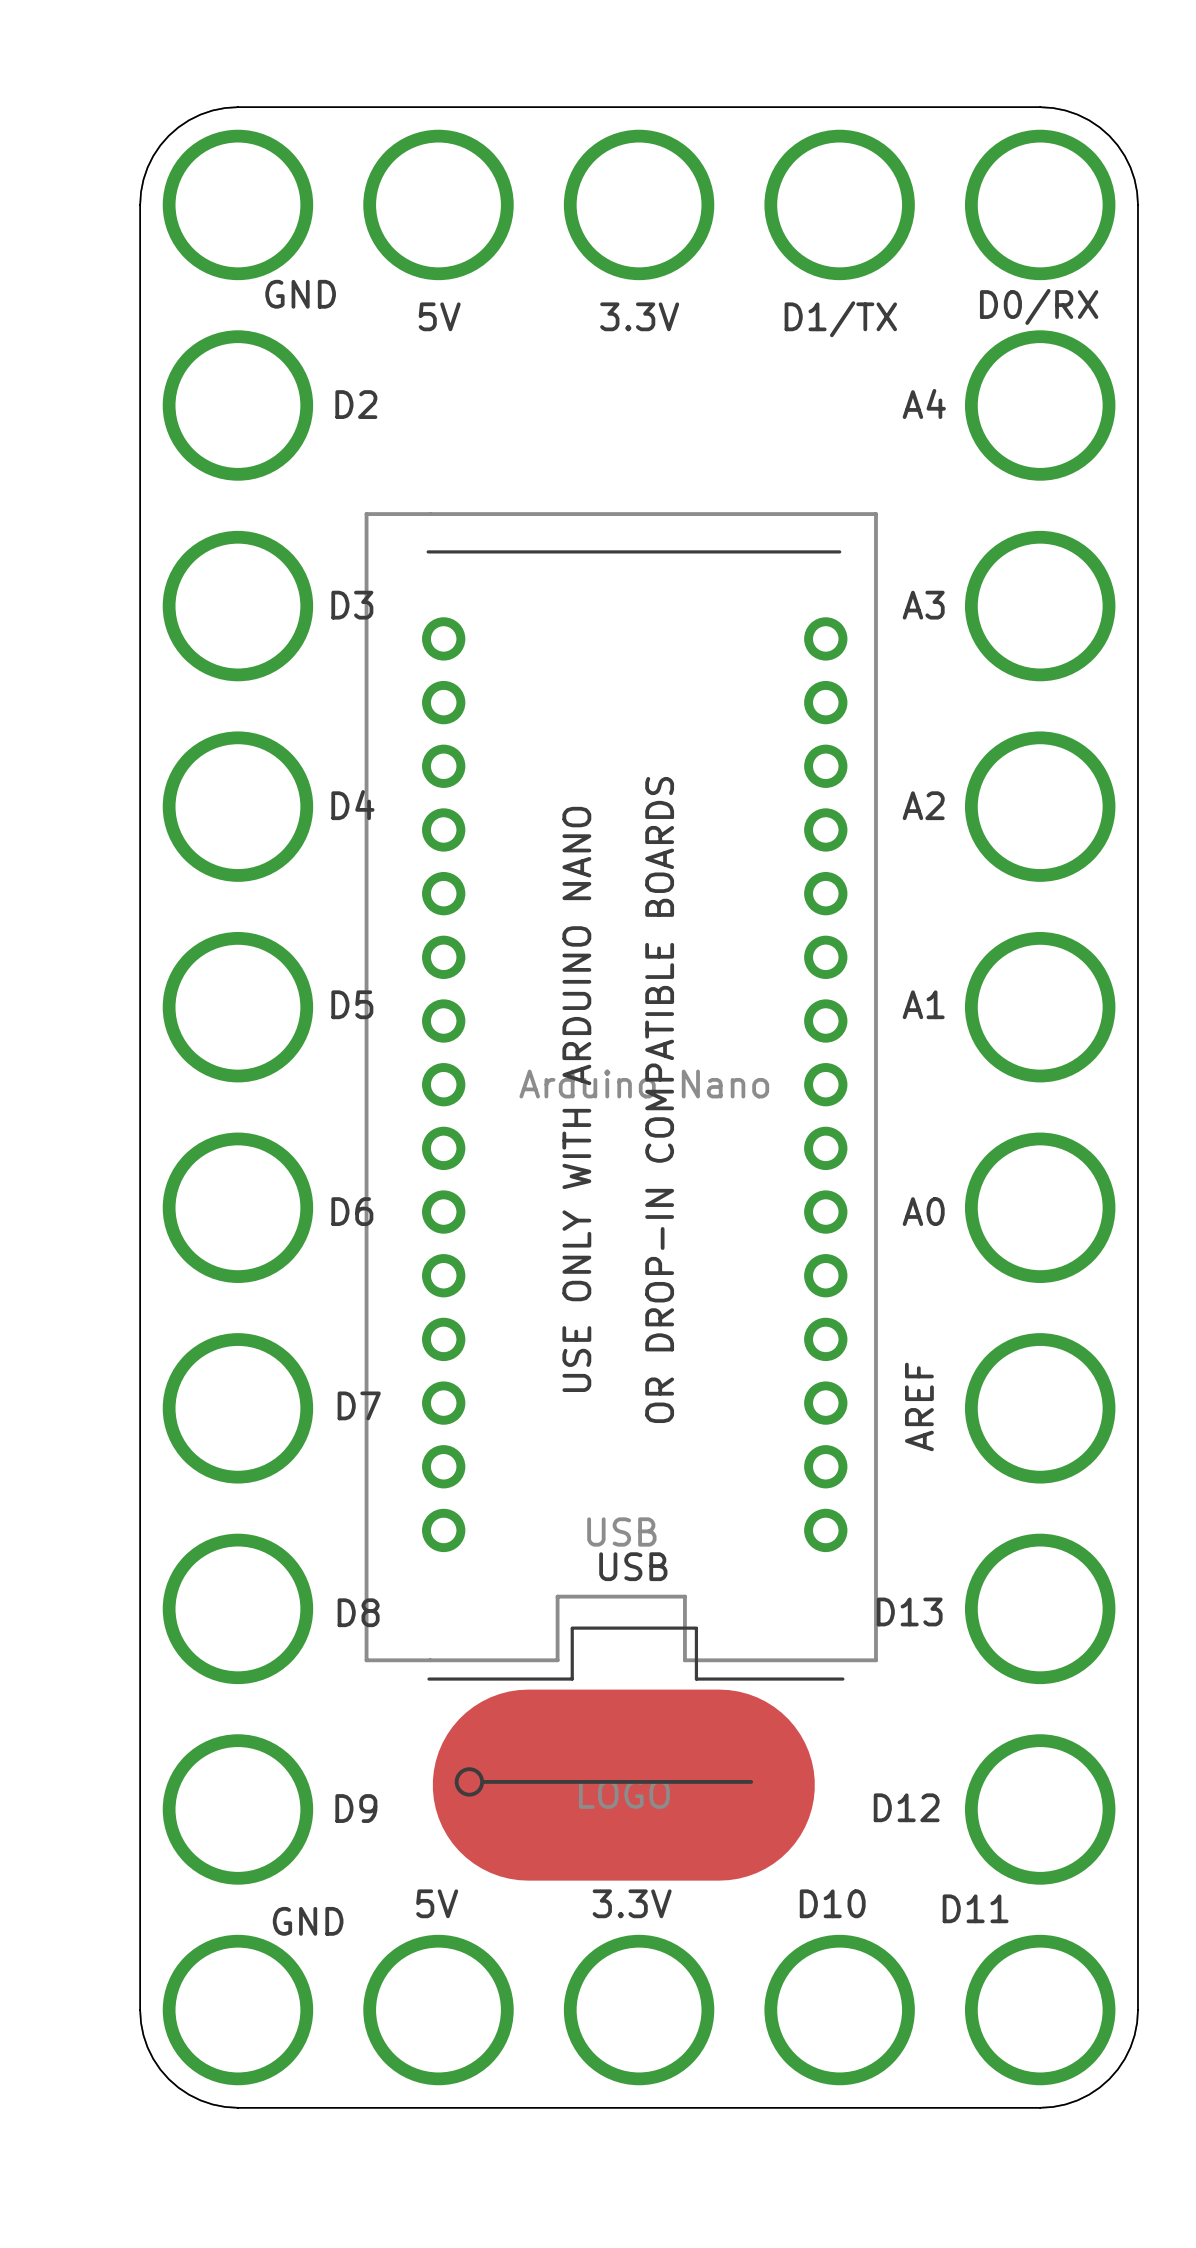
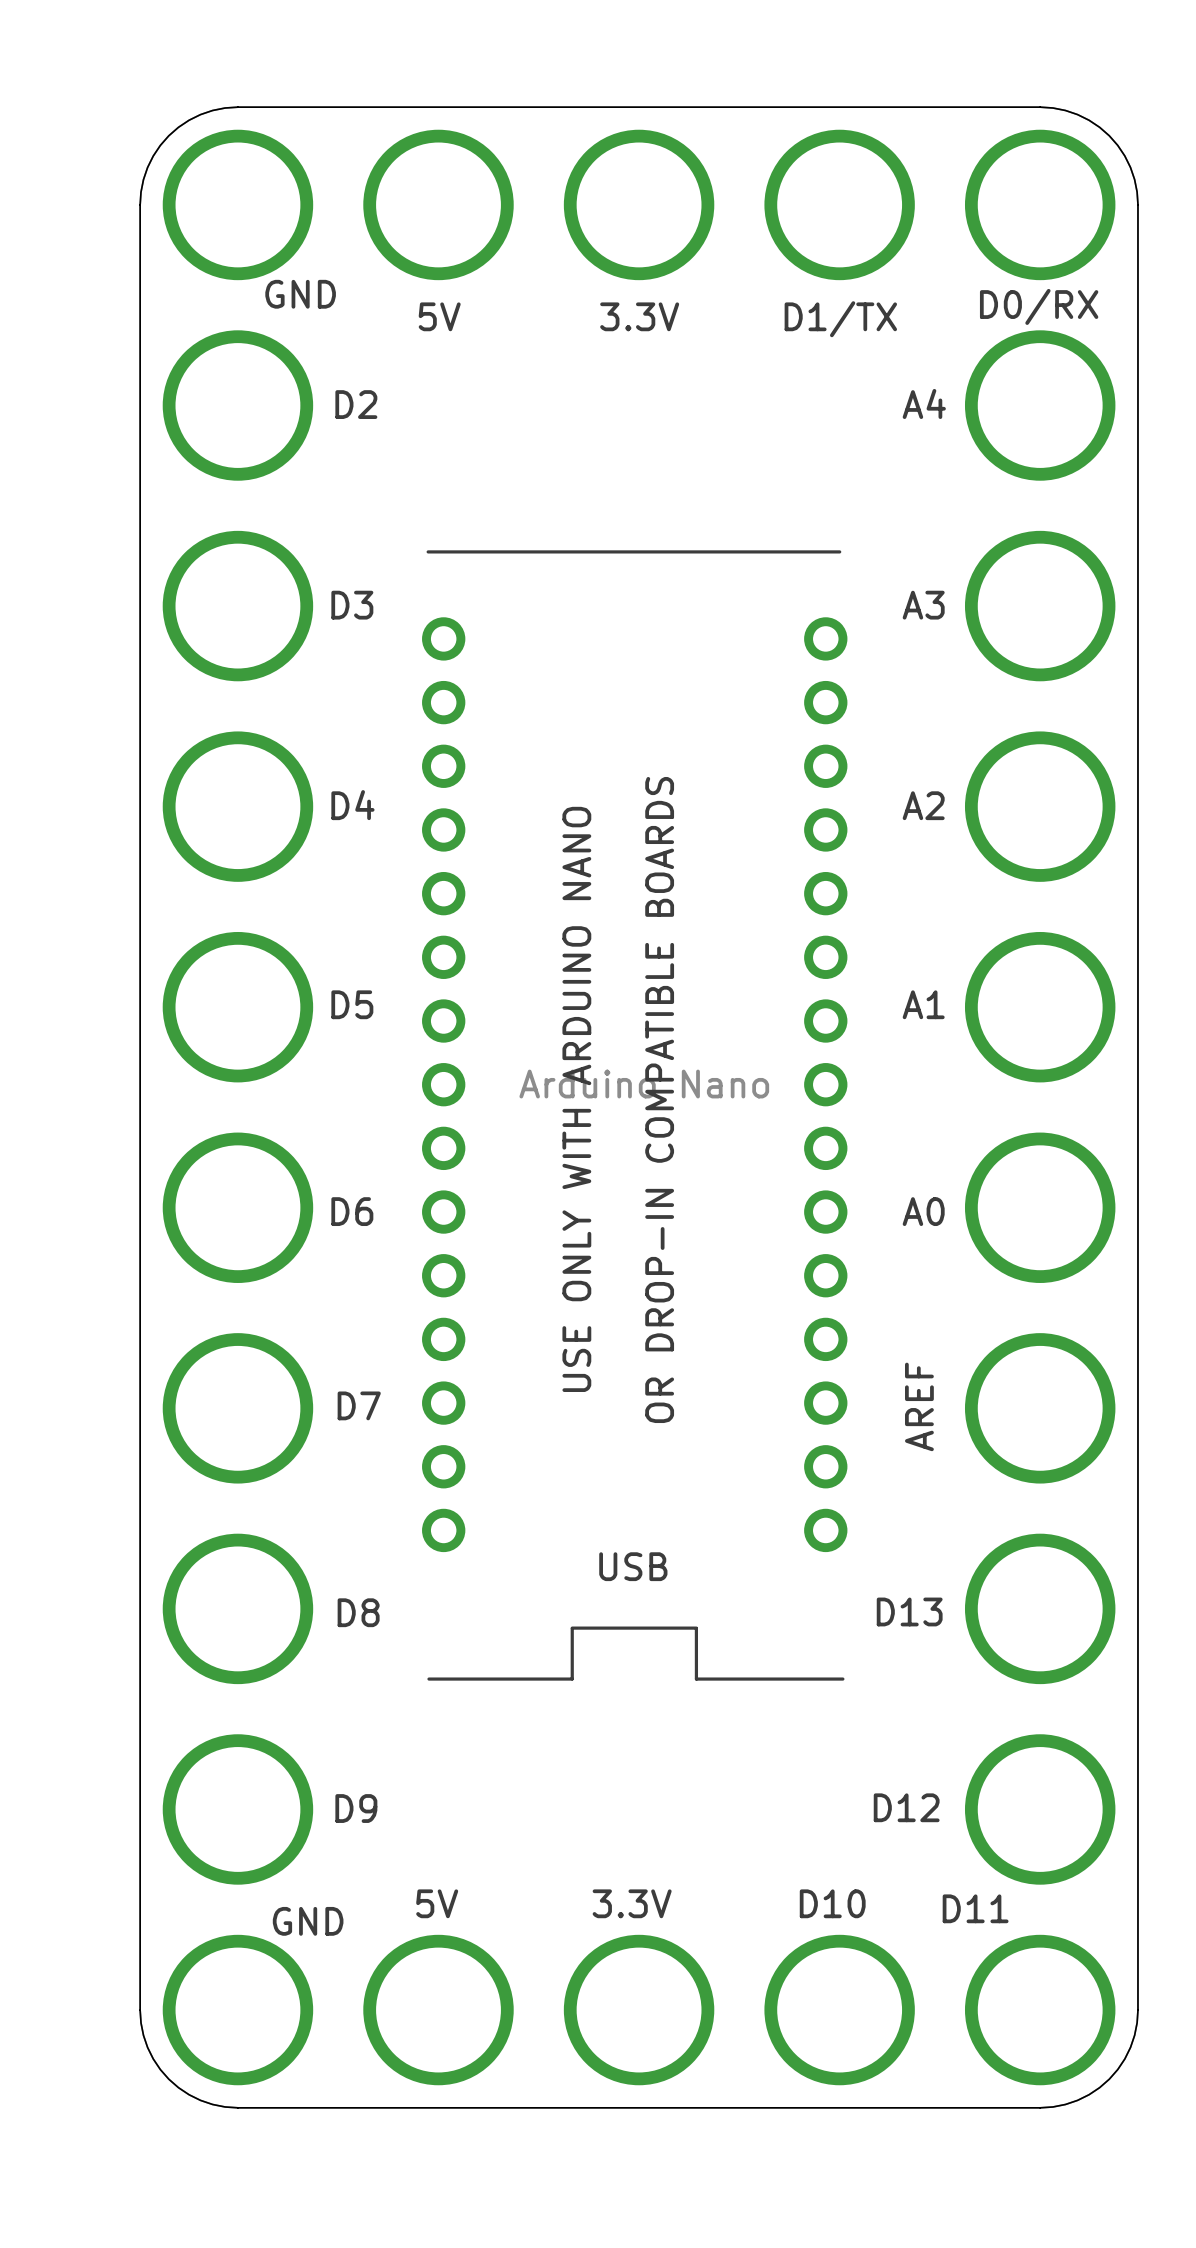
line: (366, 514) (875, 514) (875, 1660) (684, 1660) (684, 1596) (557, 1596) (557, 1660) (366, 1660) (366, 514) -> none
text: USB (621, 1531) -> none
part: (623, 1785) -> none

